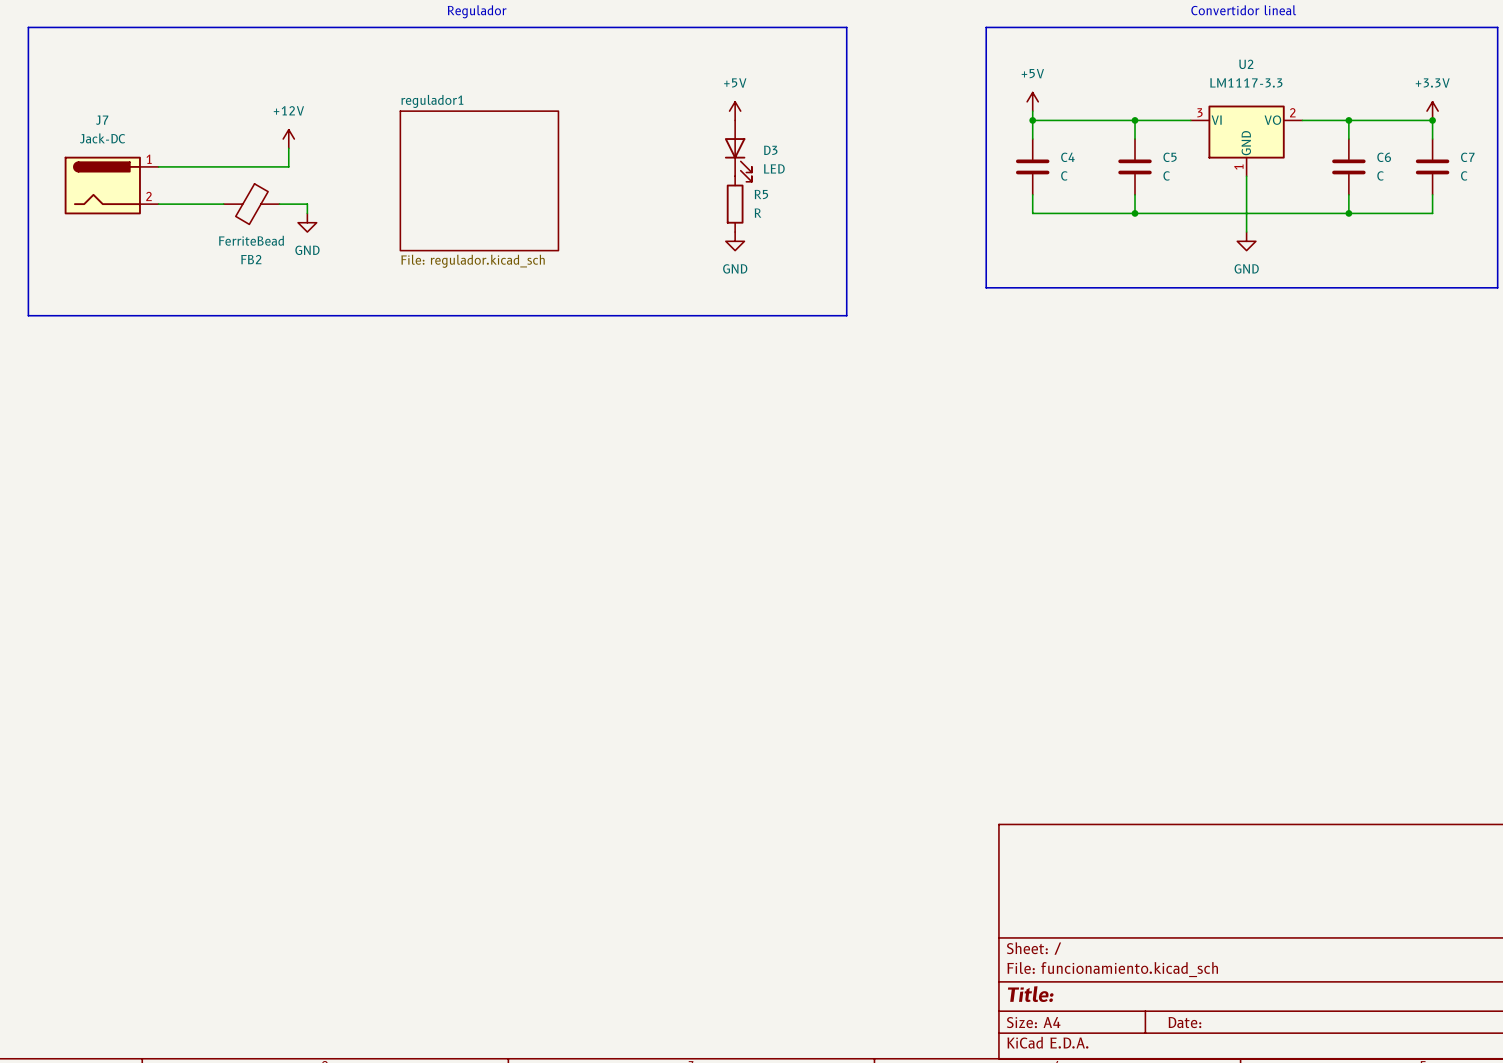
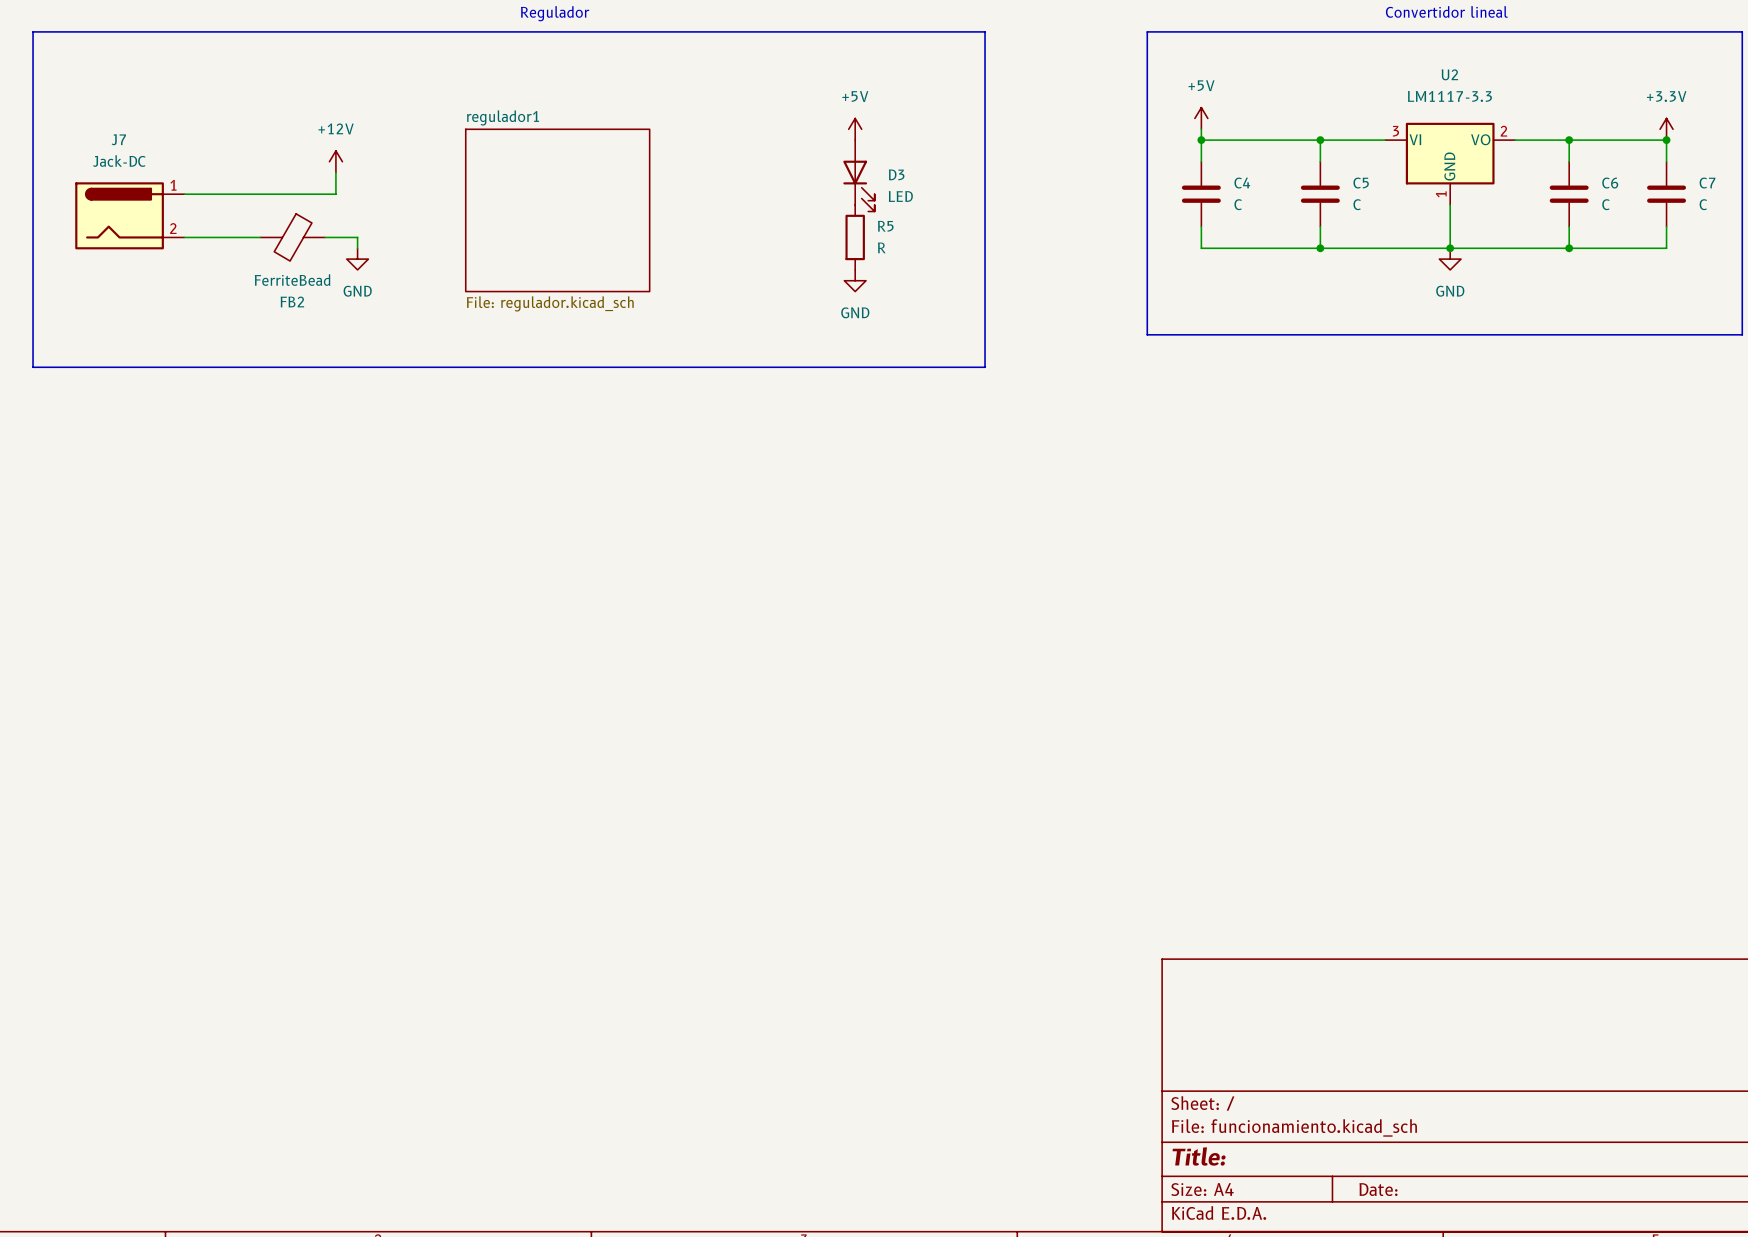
junction: none -> (1450, 248)
power symbol position: GND (1246, 241) -> GND (1450, 259)

